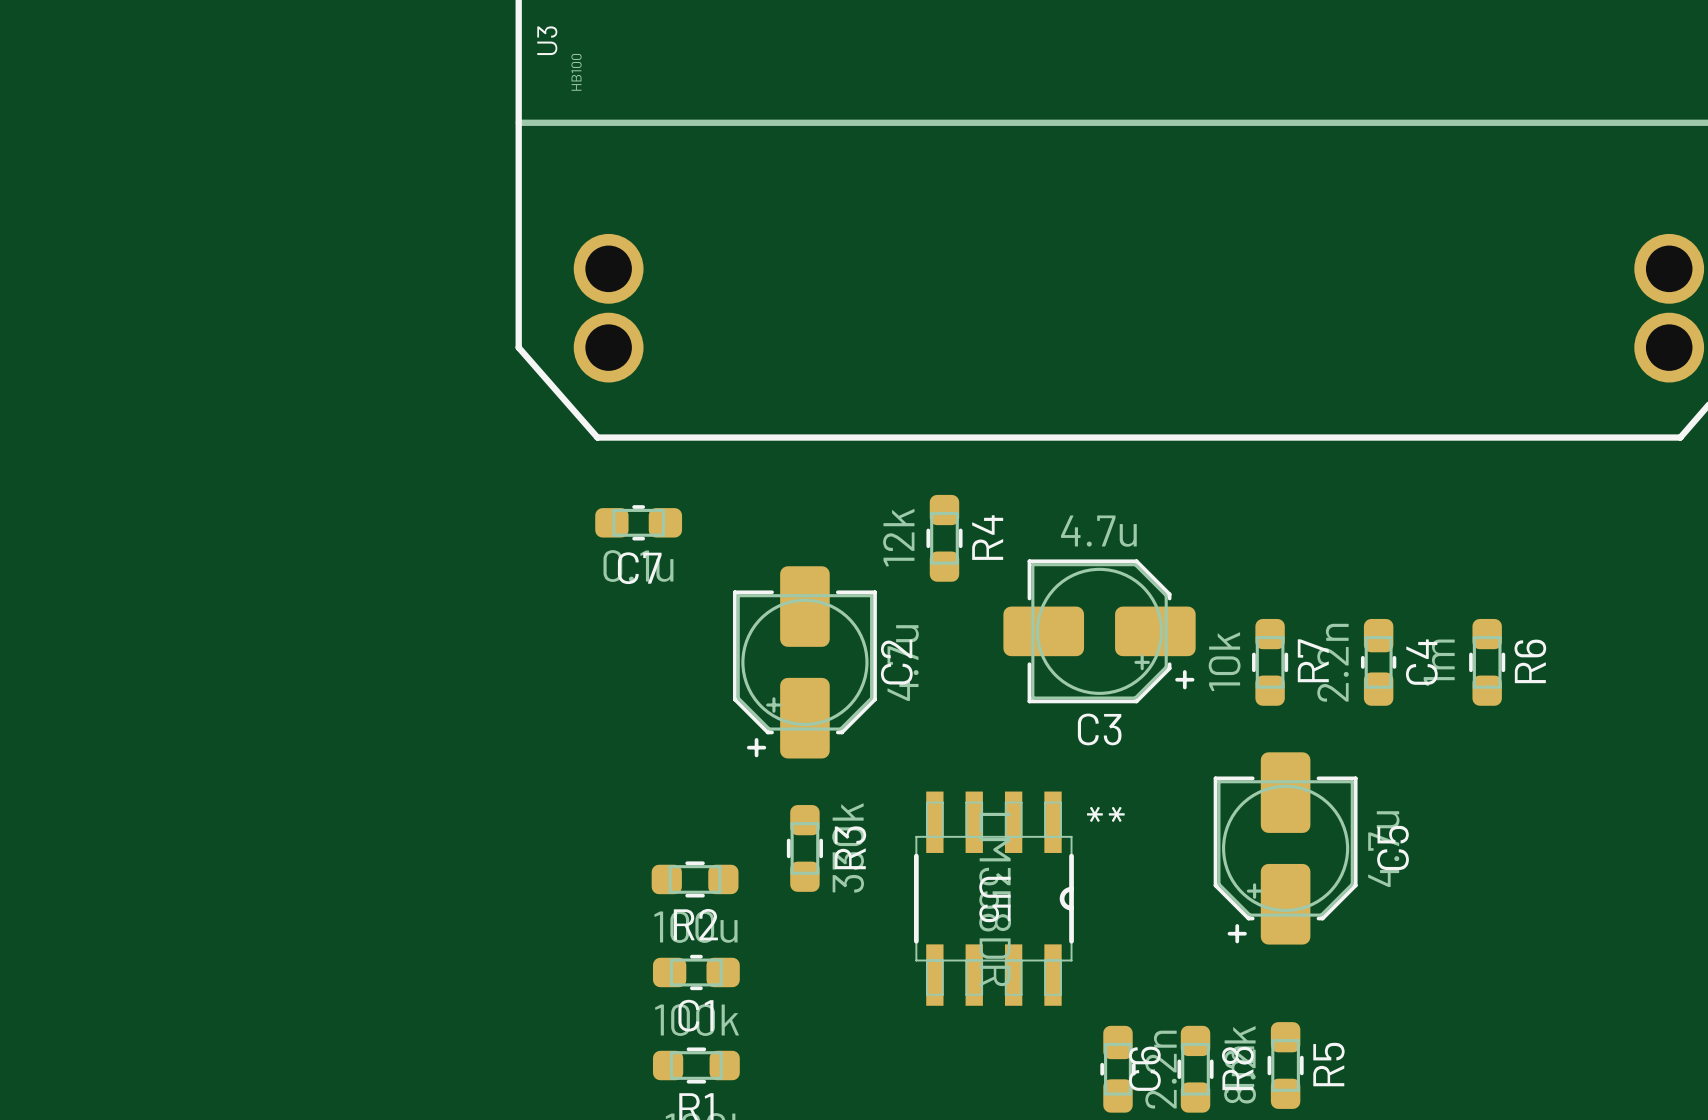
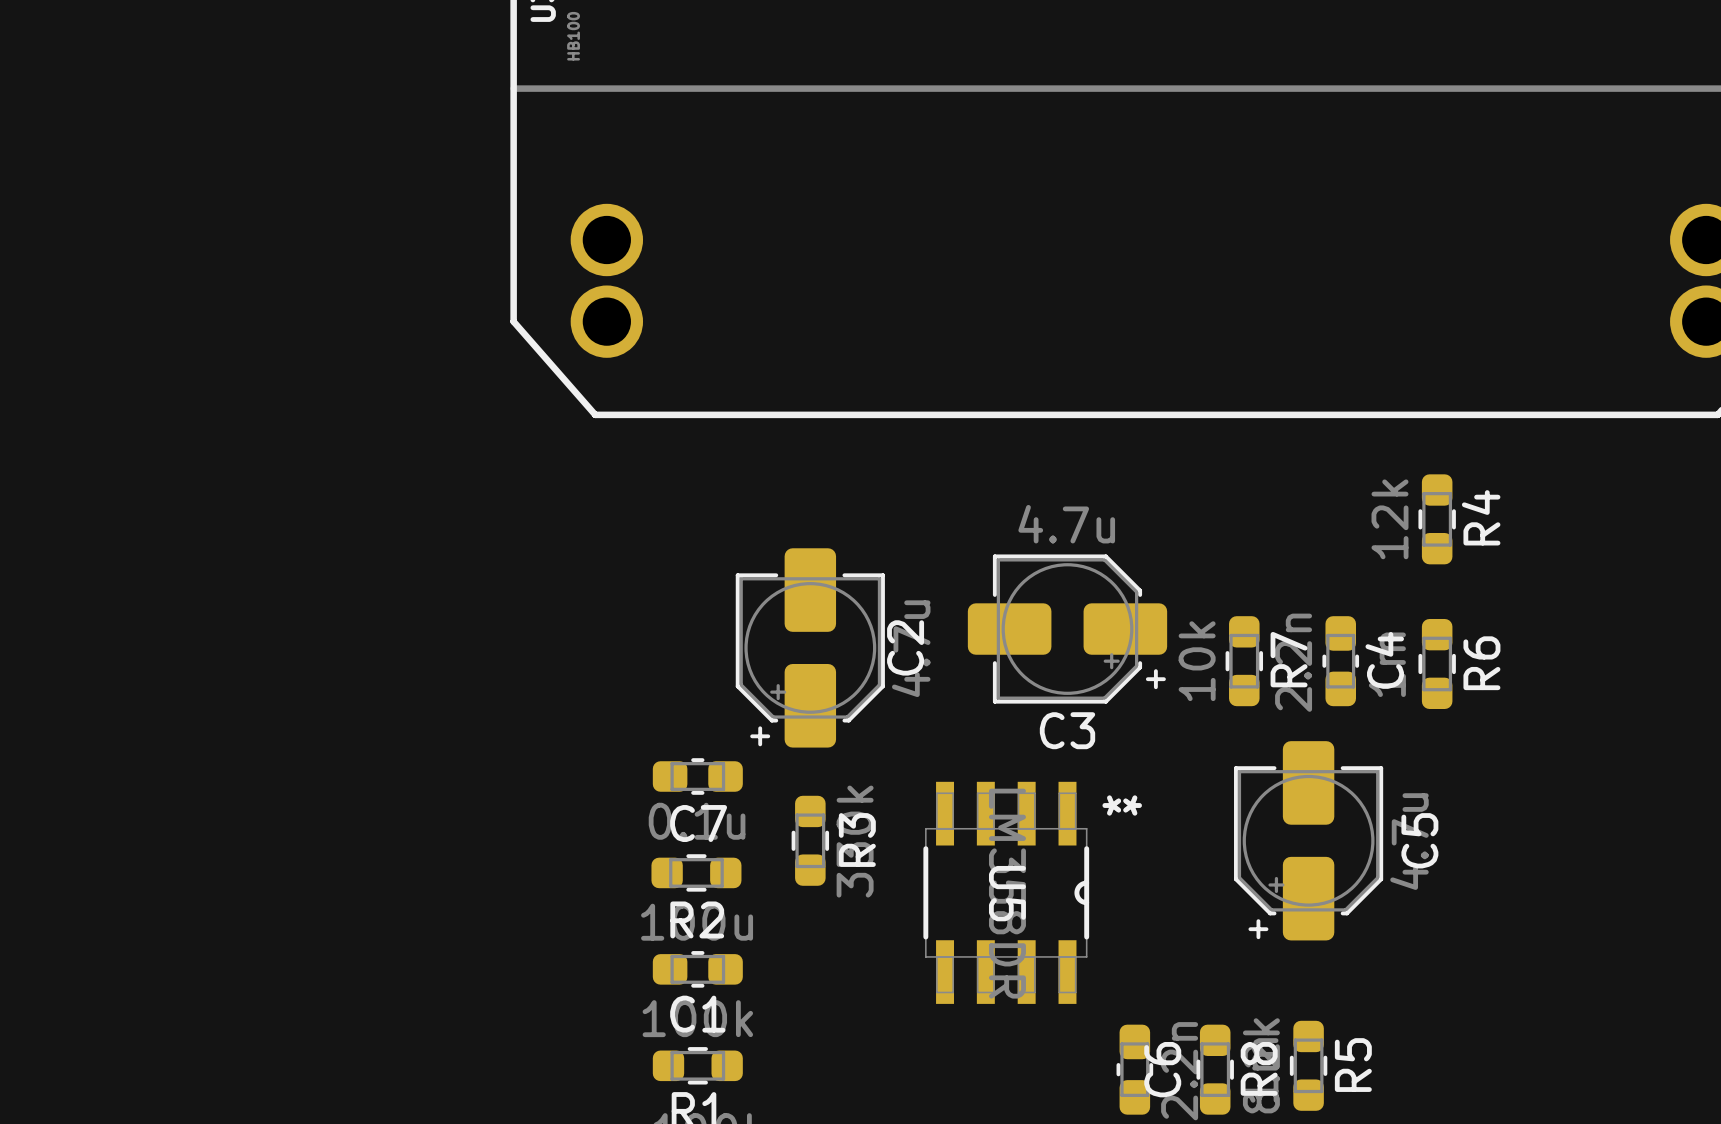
C7 position: (638, 522) -> (697, 776)
R4 position: (944, 538) -> (1437, 519)
C3 position: (1099, 631) -> (1067, 629)
R7 position: (1270, 662) -> (1244, 661)
C4 position: (1378, 662) -> (1340, 661)
R6 position: (1487, 662) -> (1437, 663)

